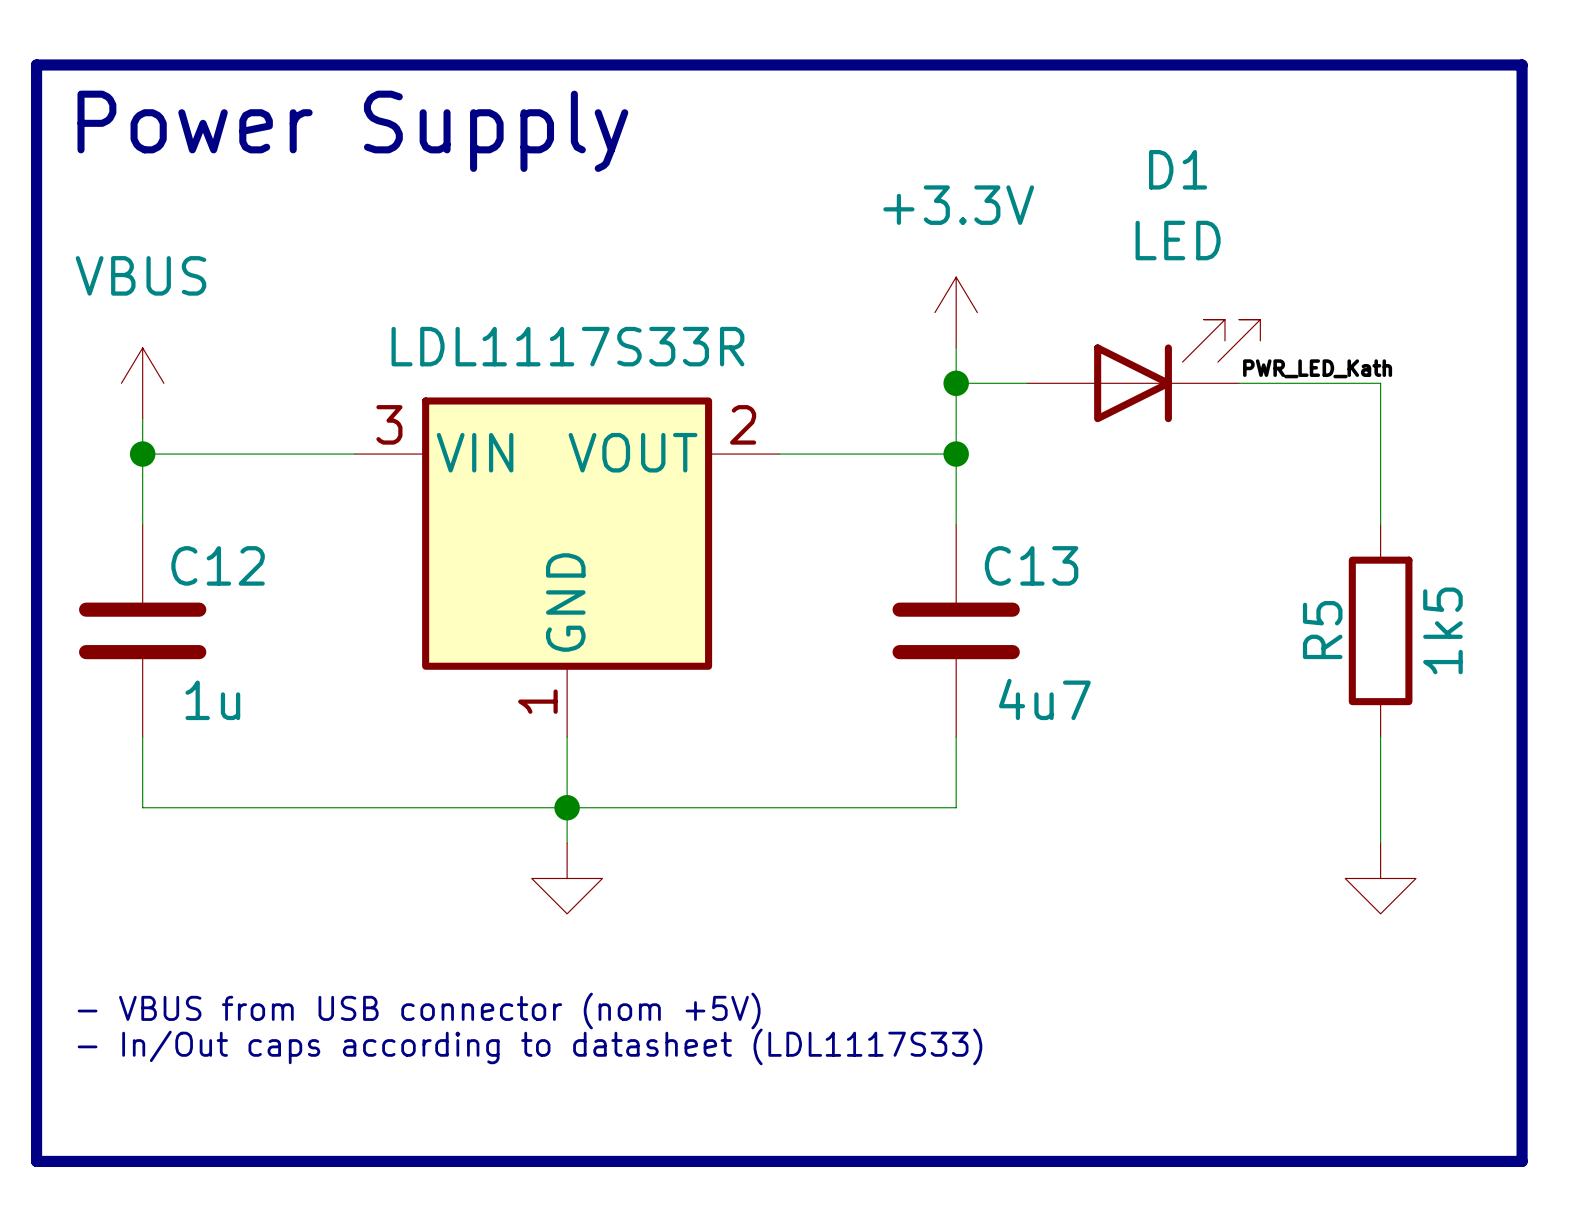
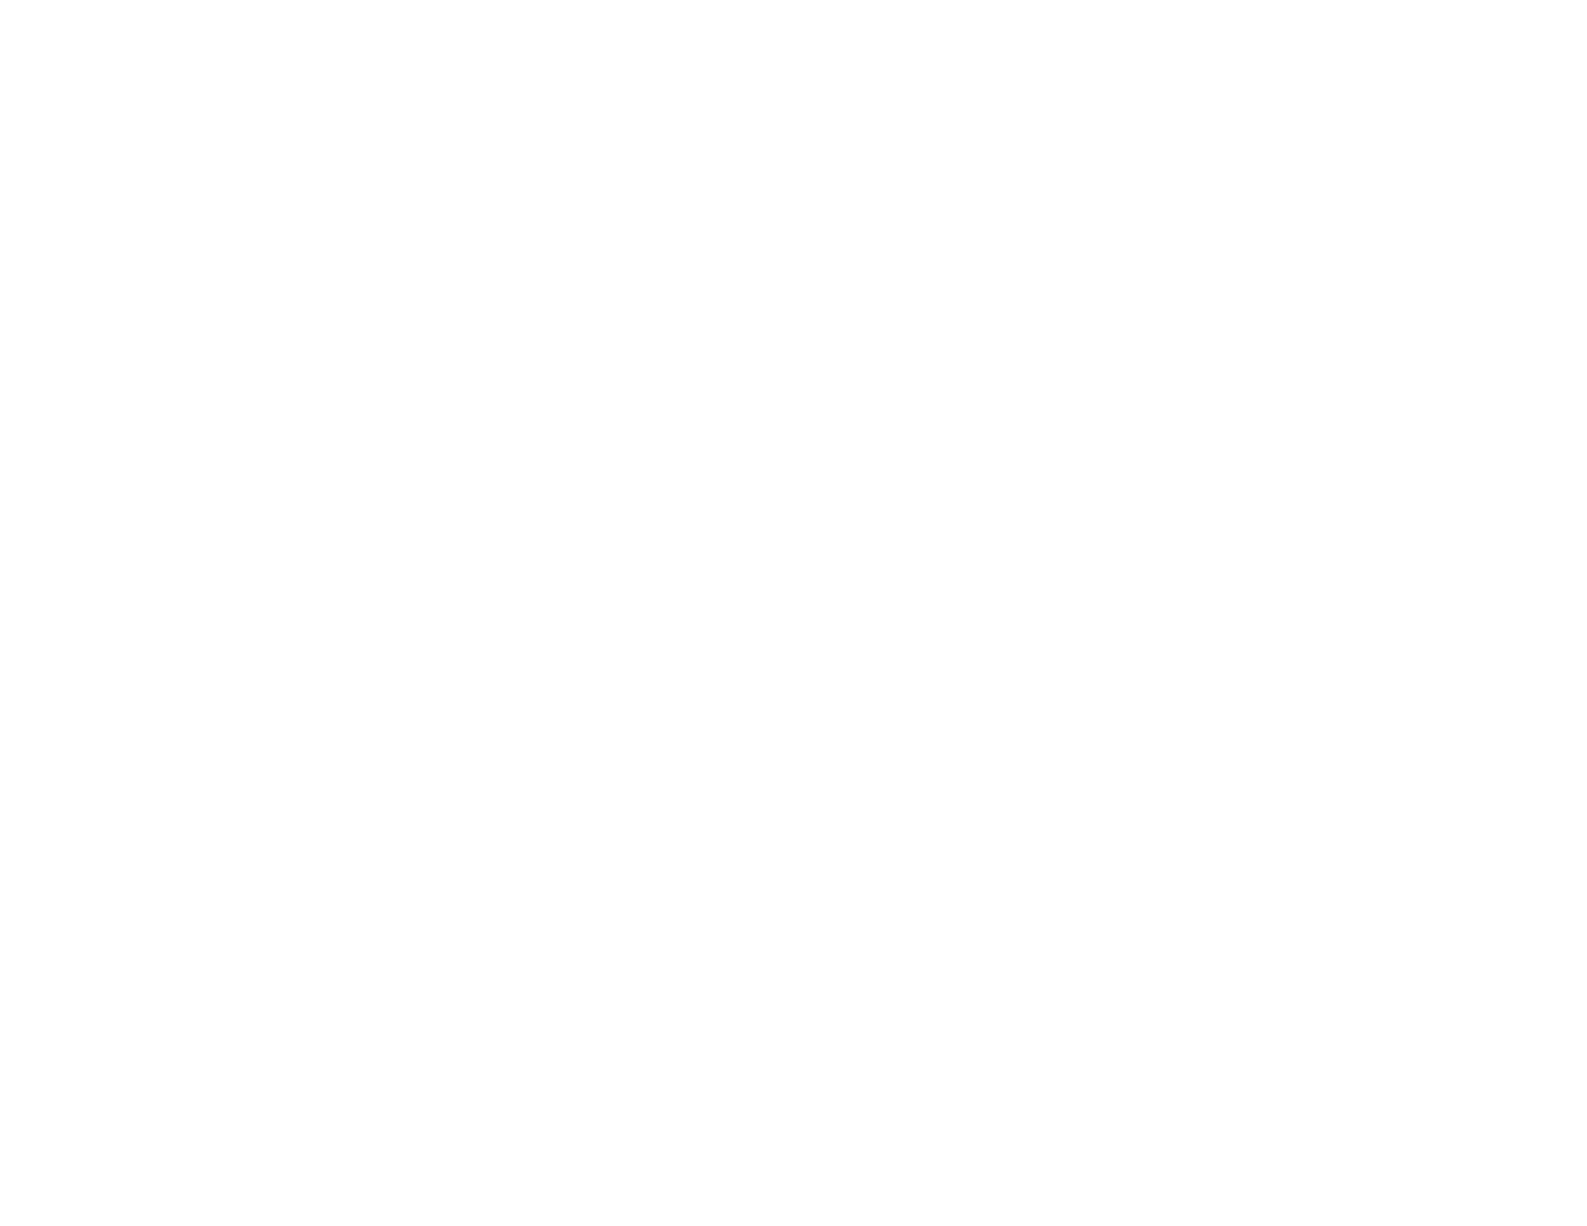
line: (36, 64) (1522, 64) (1522, 1161) (36, 1161) (36, 64) -> none
text: Power Supply (352, 131) -> none
power symbol: +3.3V (956, 312) -> none
wire: (956, 347) (956, 524) -> none
label: PWR_LED_Kath (1317, 368) -> none
D1: LED (1143, 370) -> none
power symbol: VBUS (142, 383) -> none
wire: (956, 383) (1026, 383) -> none
junction: (956, 383) -> none
wire: (1239, 383) (1380, 383) (1380, 524) -> none
wire: (142, 418) (142, 524) -> none
wire: (142, 454) (354, 454) -> none
junction: (142, 454) -> none
wire: (779, 454) (956, 454) -> none
junction: (956, 454) -> none
part: LDL1117S33R (567, 567) -> none
C12: 1u (142, 630) -> none
C13: 4u7 (956, 630) -> none
R5: 1k5 (1380, 630) -> none
wire: (142, 737) (142, 807) (956, 807) (956, 737) -> none
wire: (567, 737) (567, 843) -> none
wire: (1380, 737) (1380, 843) -> none
junction: (567, 807) -> none
power symbol: (567, 878) -> none
power symbol: (1380, 878) -> none
text: - VBUS from USB connector (nom +5V) (419, 1011) -> none
text: - In/Out caps according to datasheet (LDL1117S33) (529, 1046) -> none

